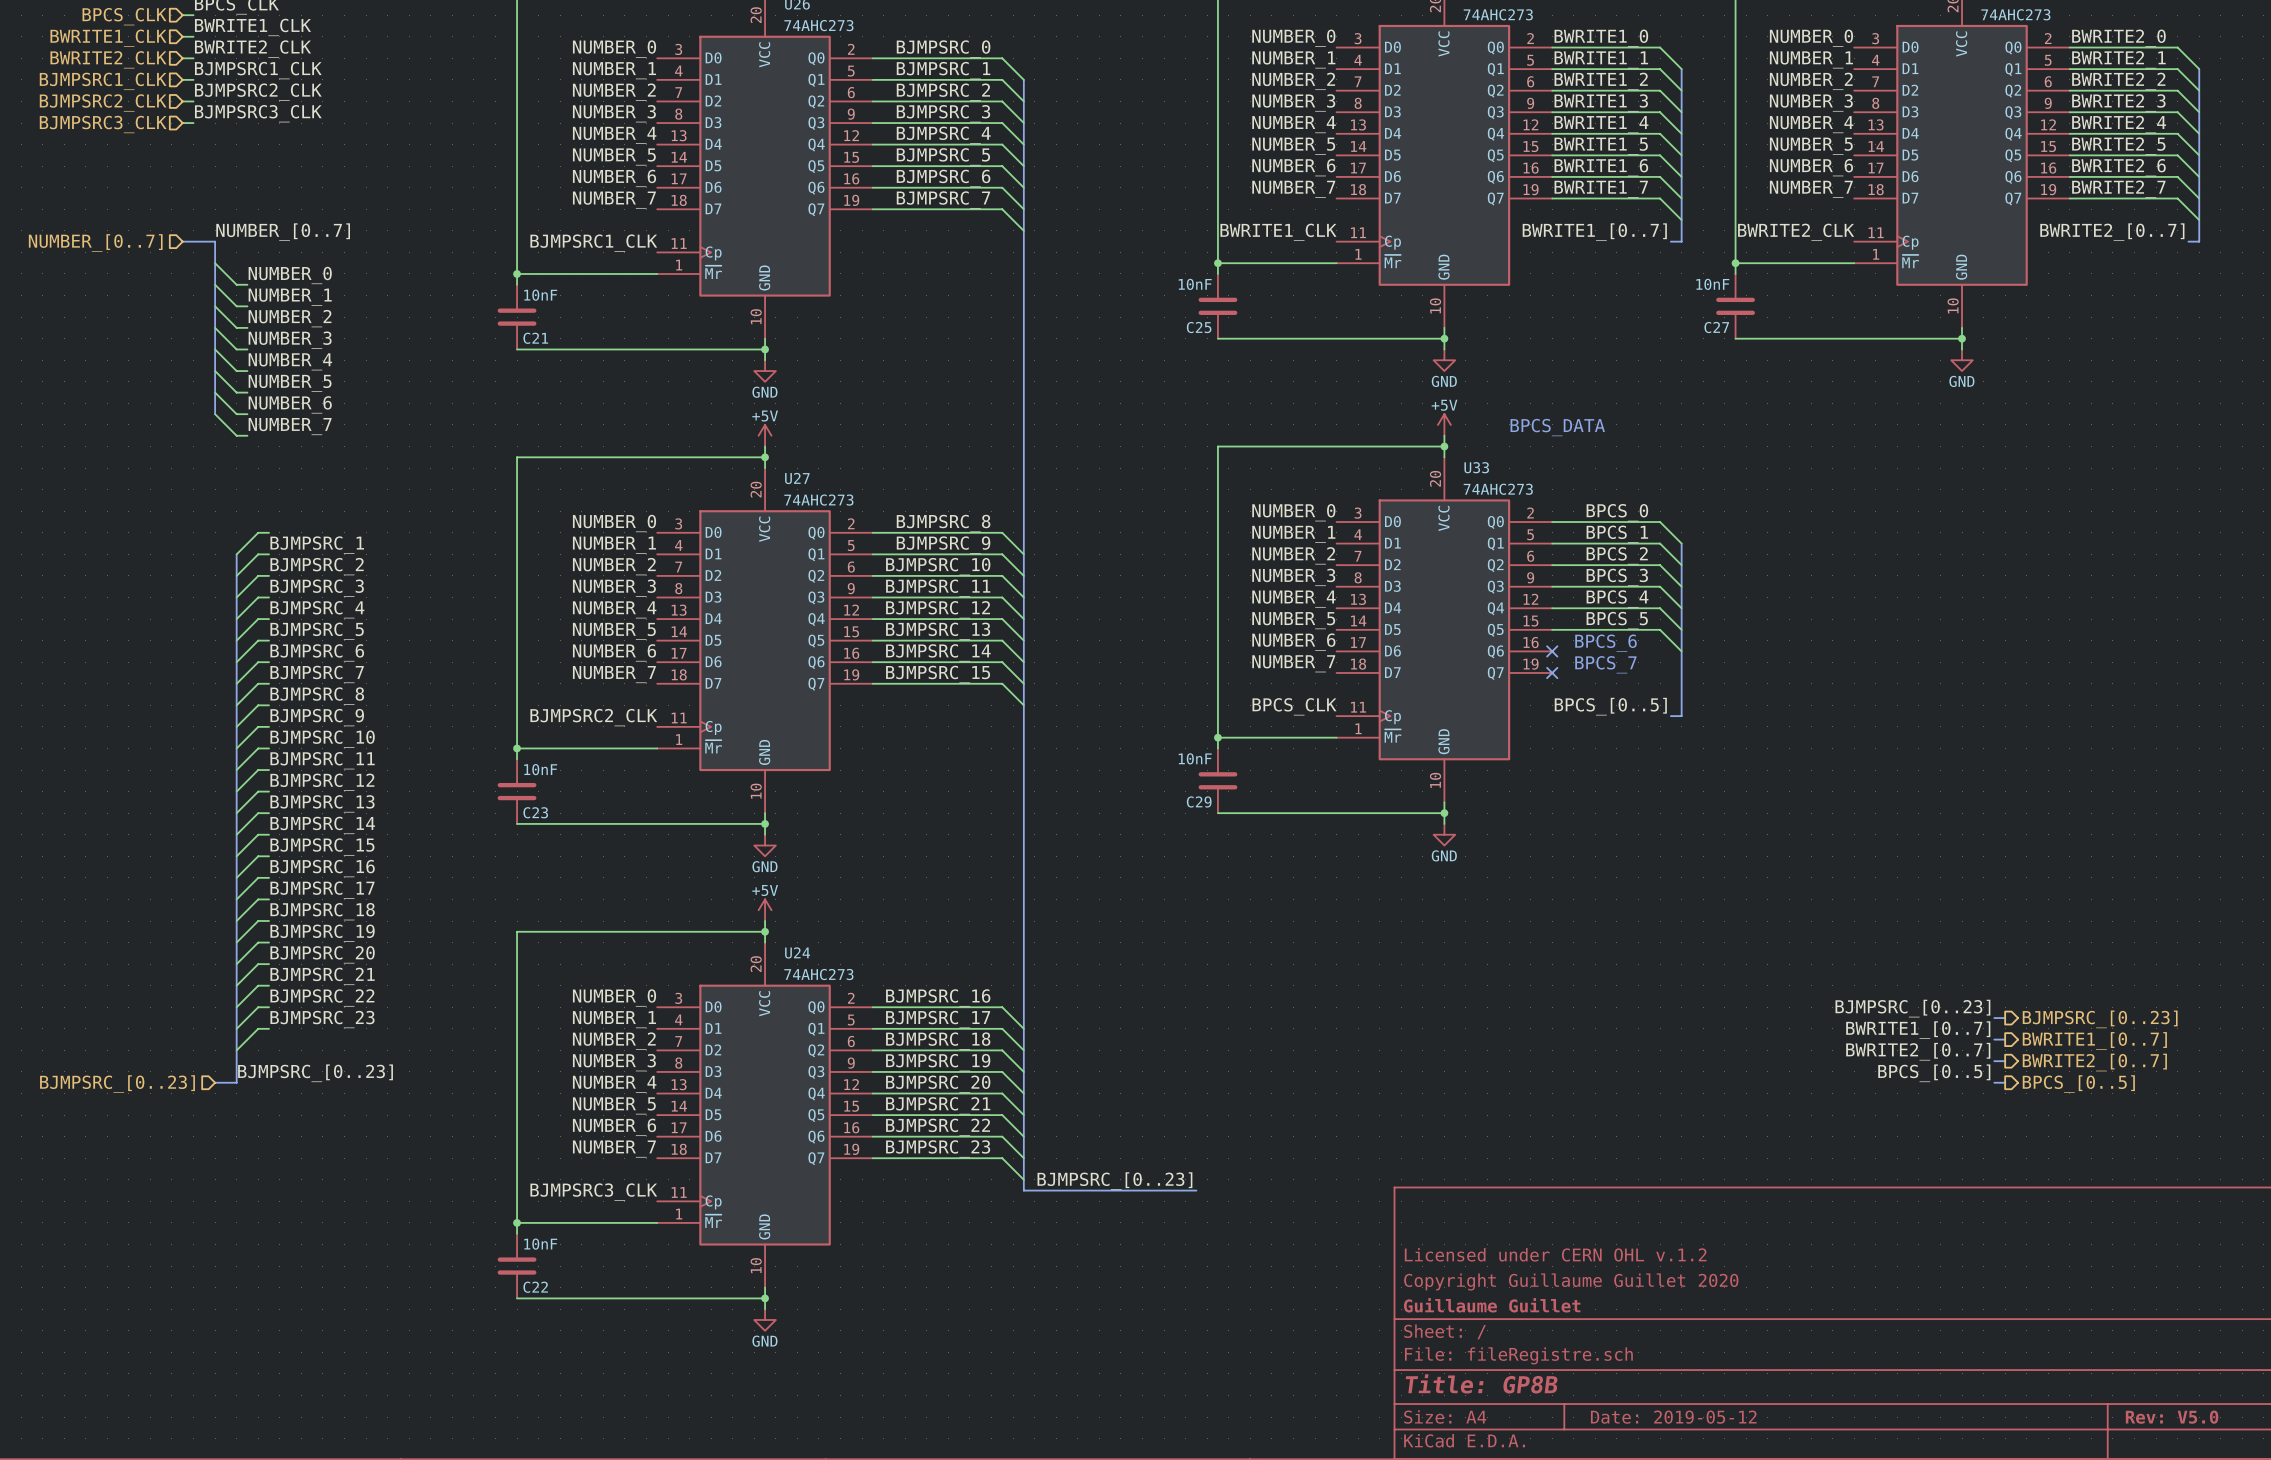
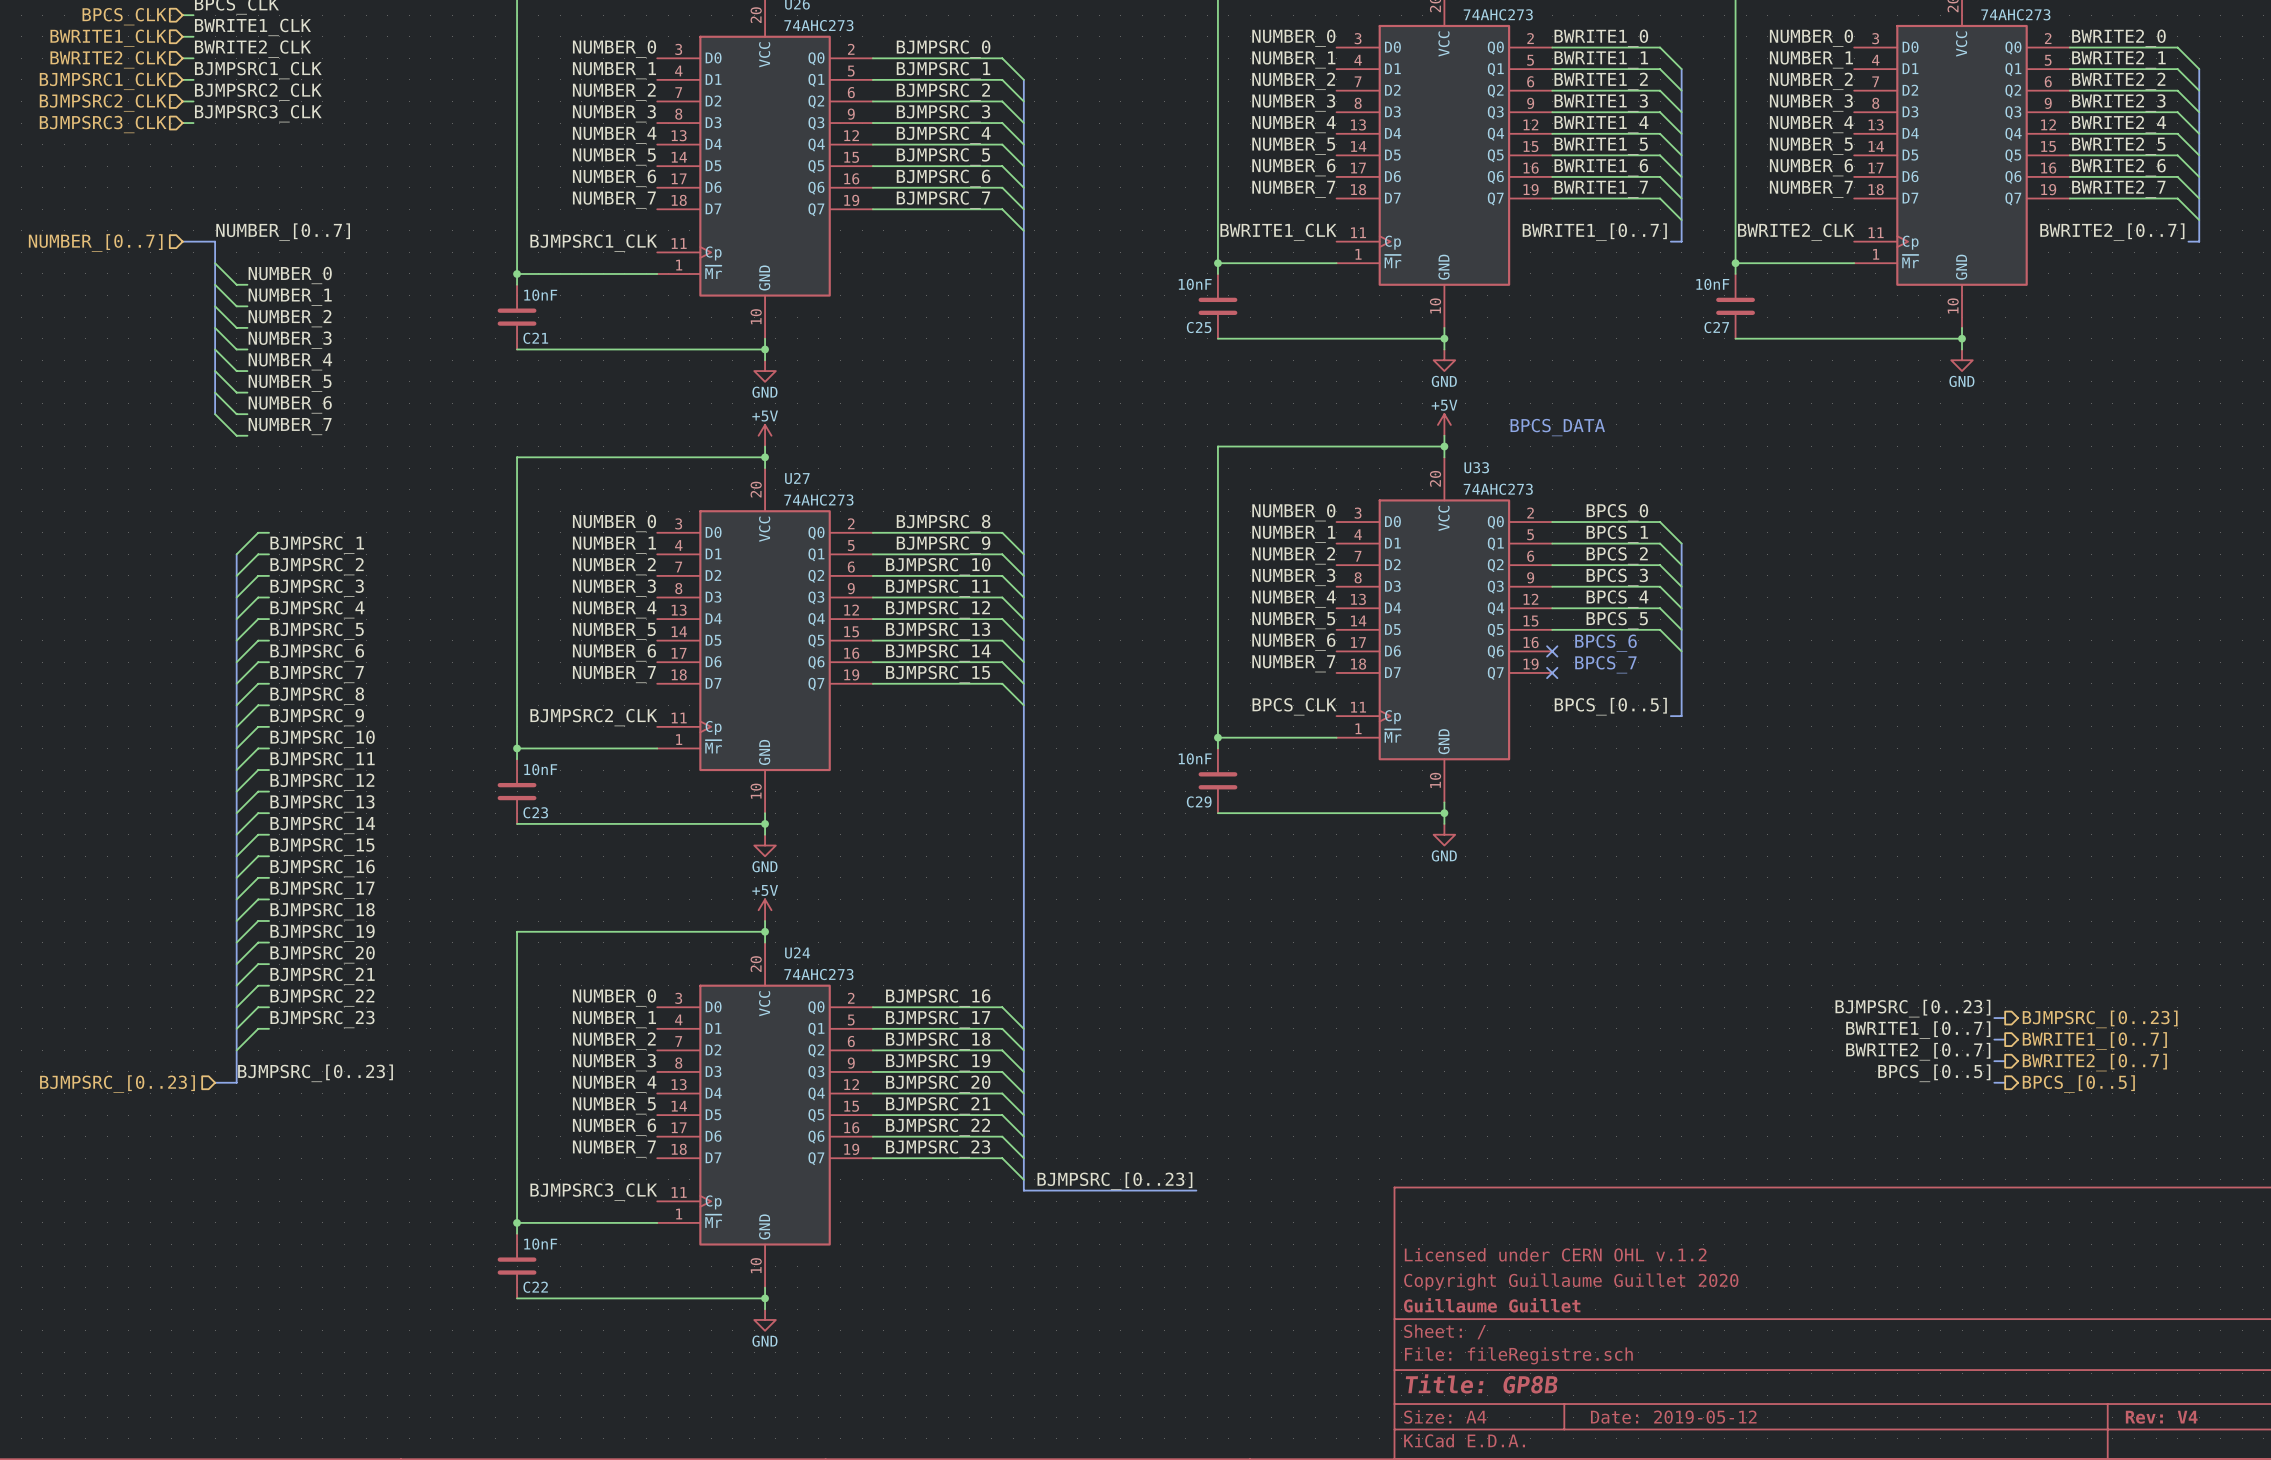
title block: Rev: V5.0 (2172, 1417) -> Rev: V4 (2161, 1417)

